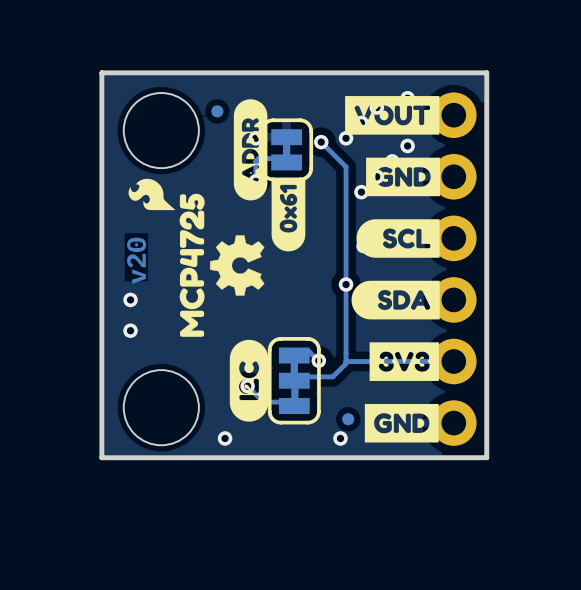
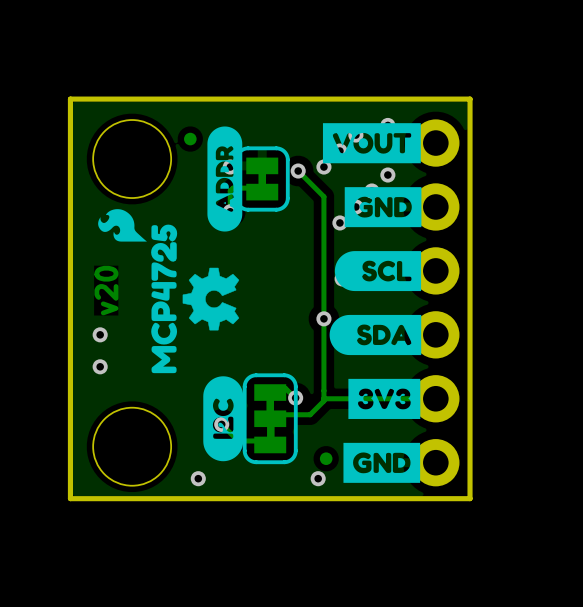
drawing: [271, 178, 306, 252] -> none

